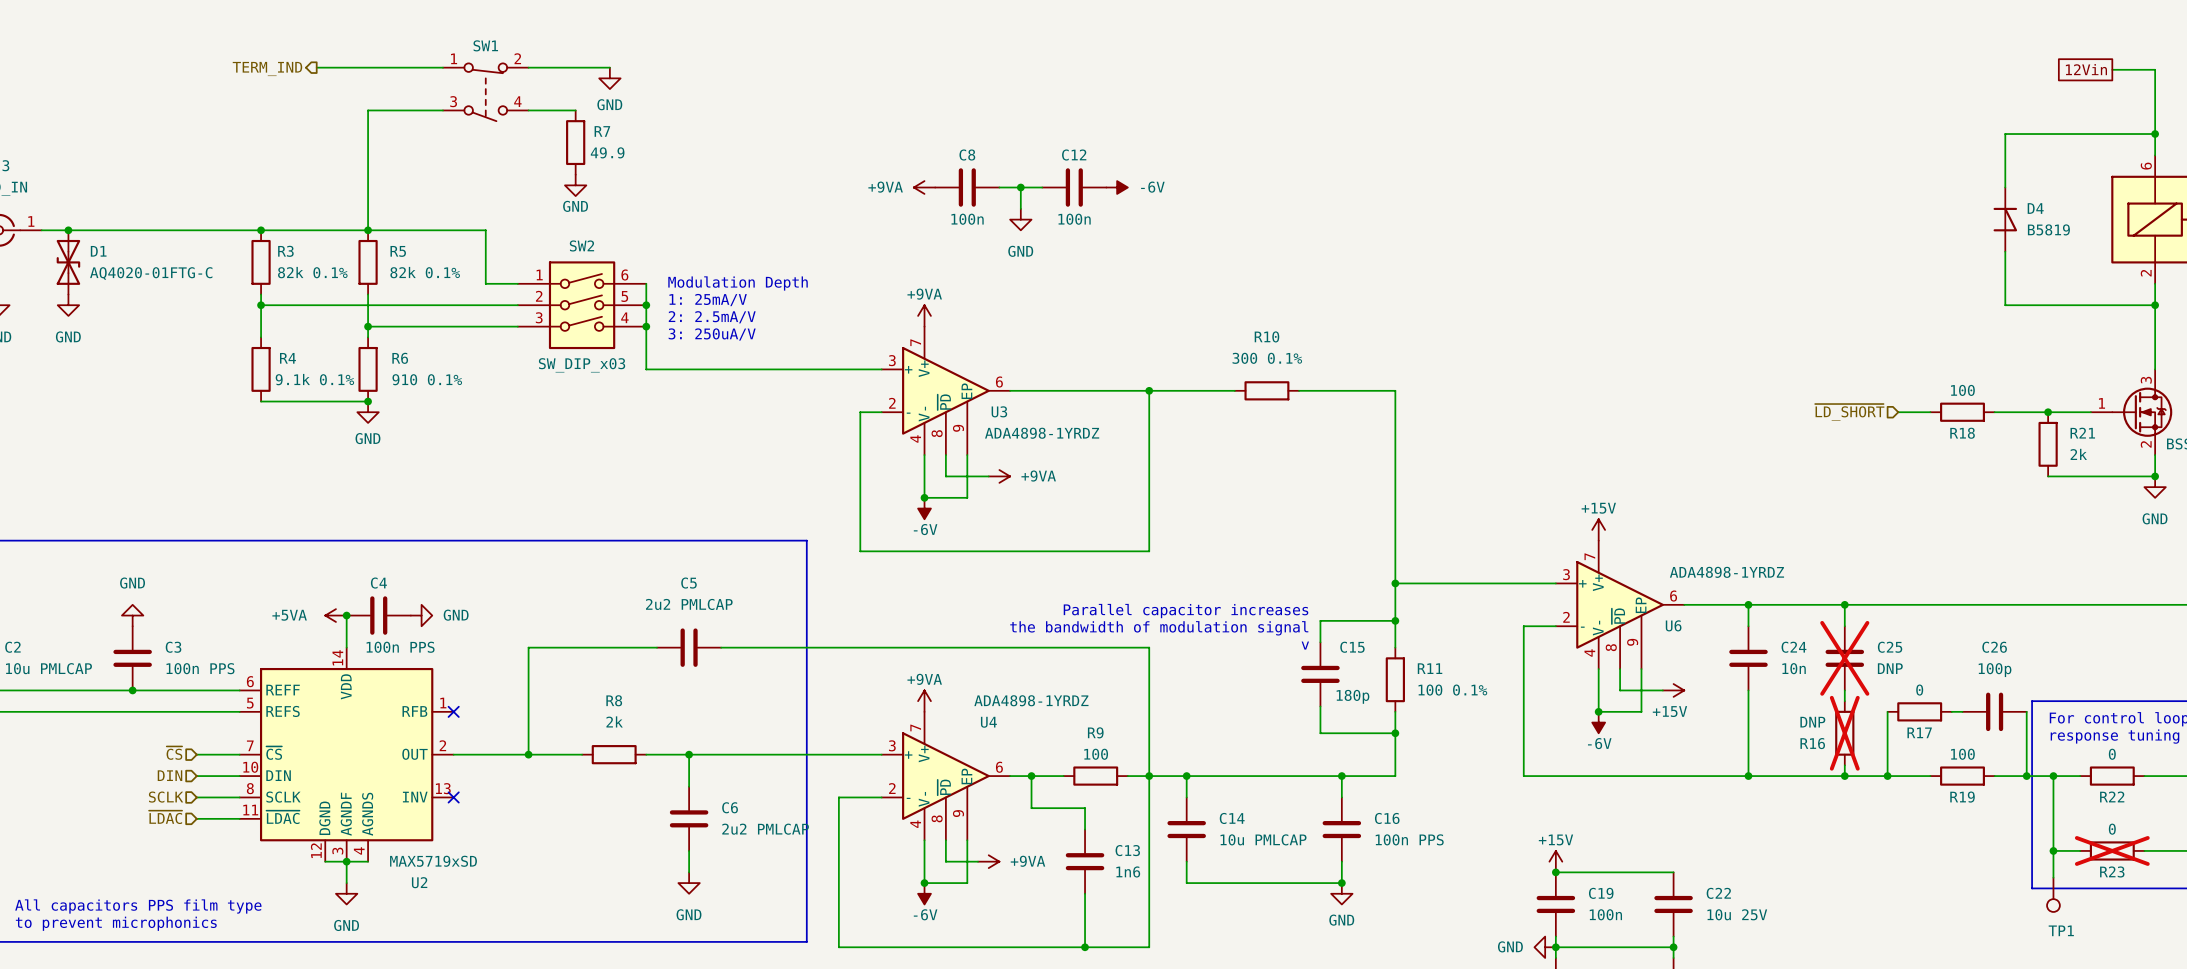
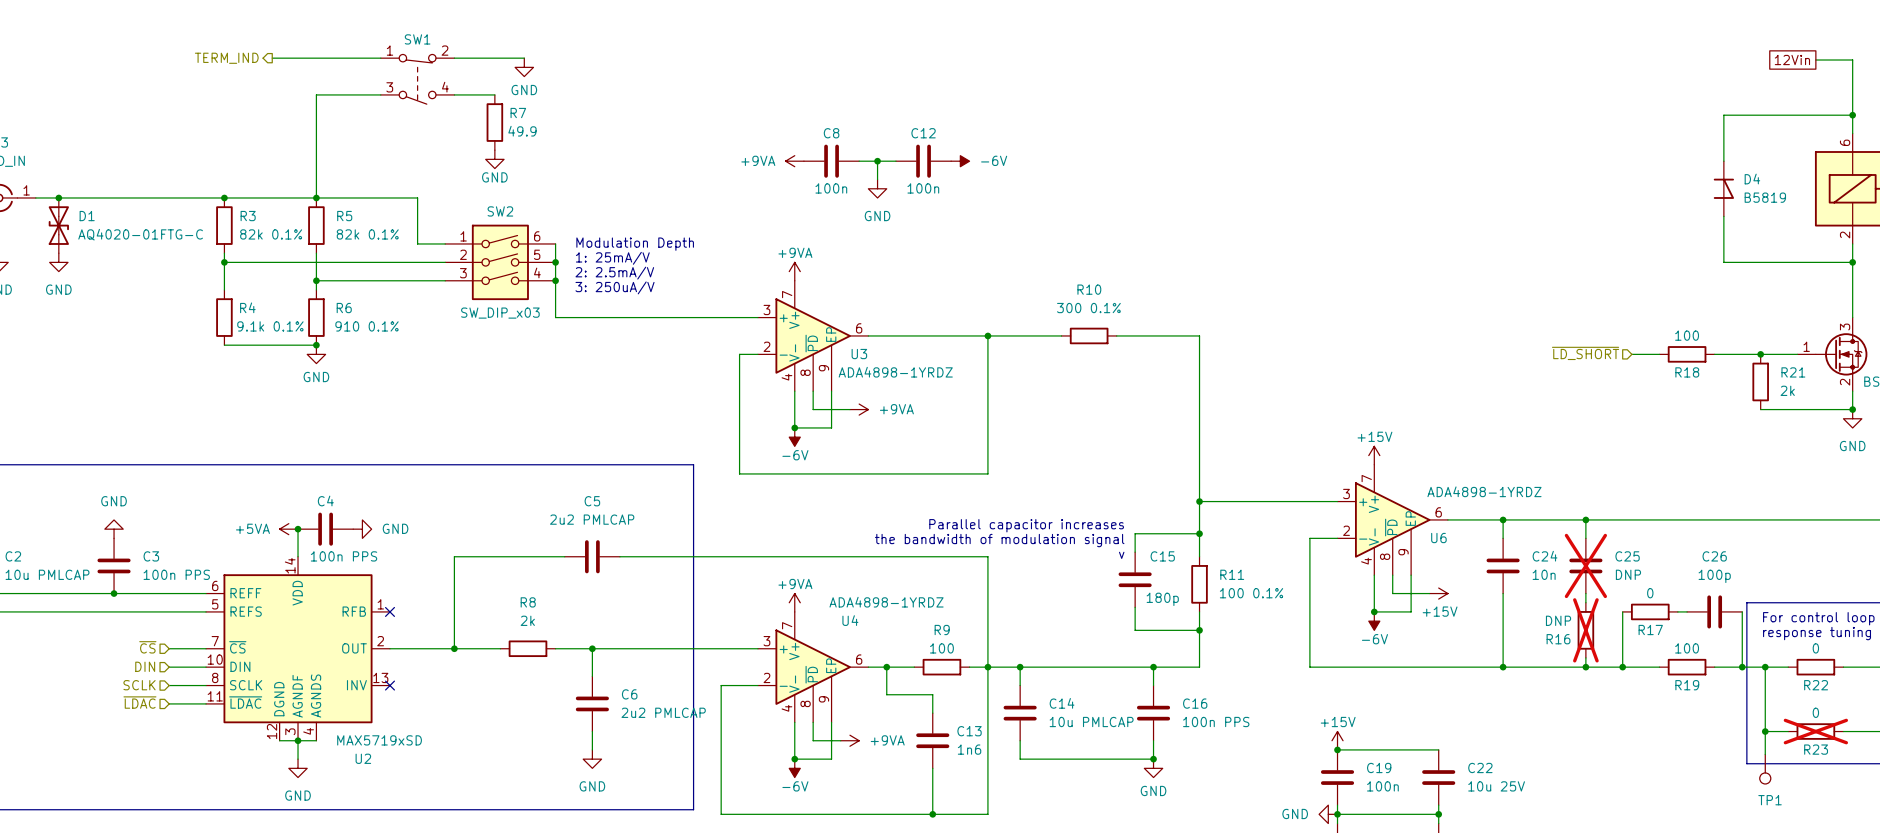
text: All capacitors PPS film type (138, 906) -> none
text: to prevent microphonics (116, 923) -> none

